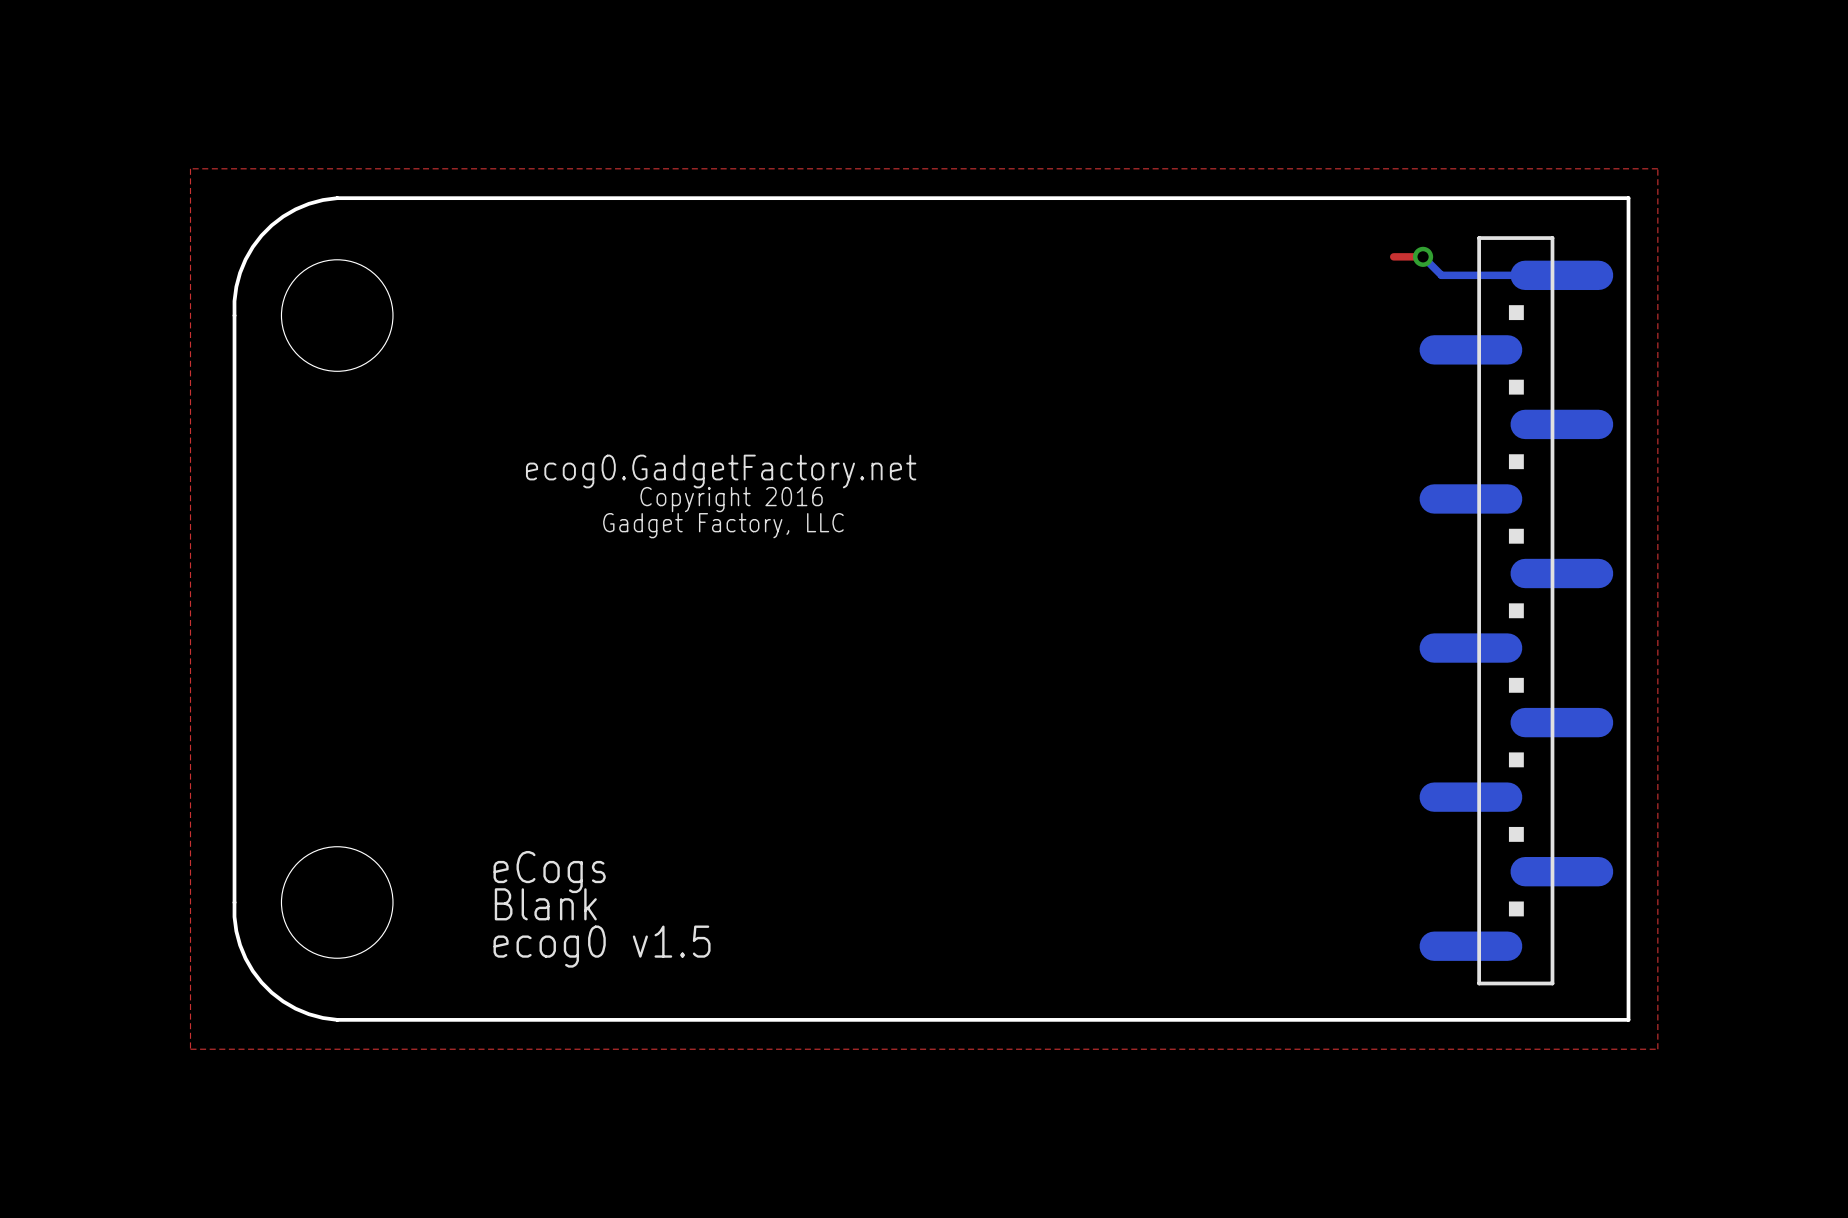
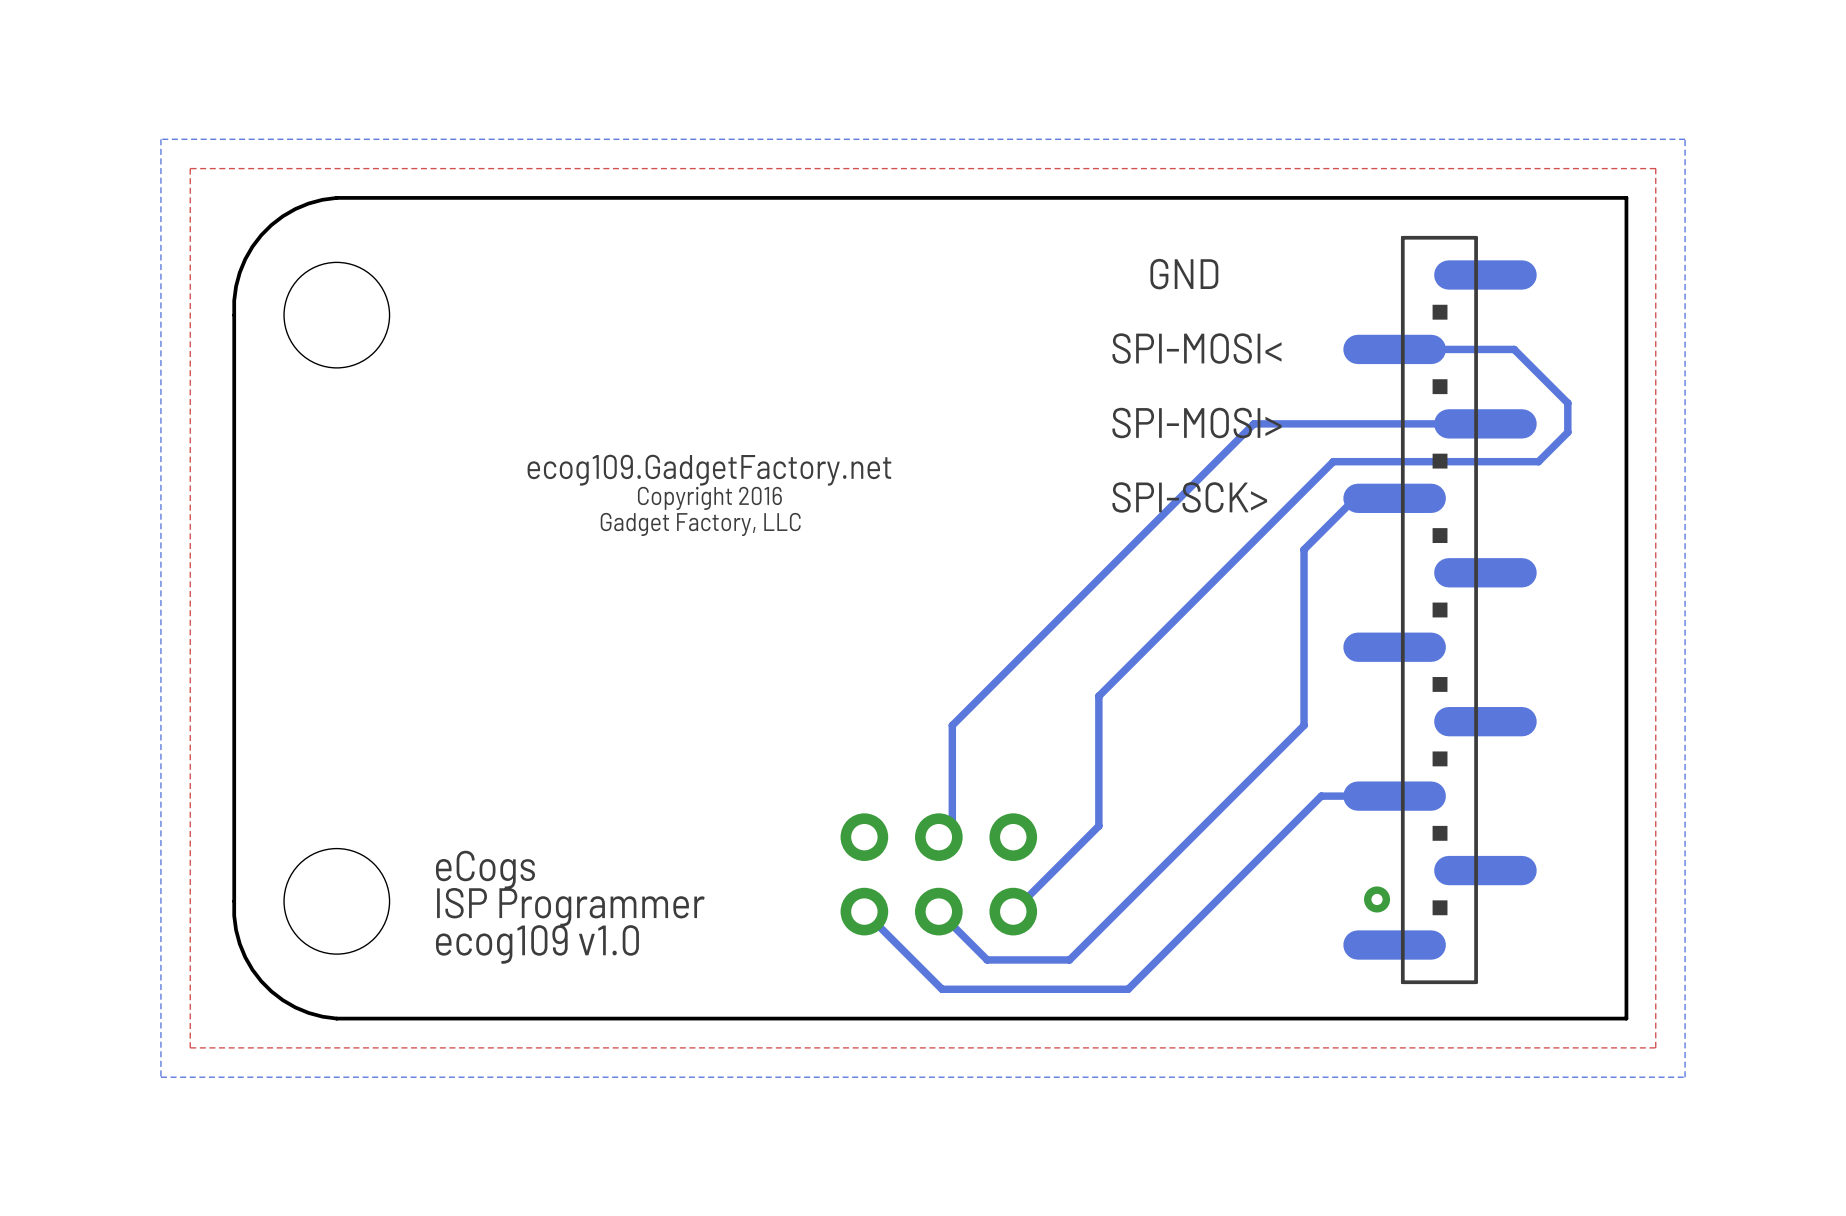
bottom zone outline: none -> (1685, 139) (160, 139) (160, 1077) (1685, 1077) (1685, 139)
part footprint: [232, 196, 1631, 1022] -> [232, 196, 1629, 1021]
bottom track: (1423, 256) (1441, 275) (1561, 275) -> none
top track: (1423, 256) (1393, 256) -> none
via: (1423, 256) -> none
text: none -> GND (1184, 274)
text: none -> SPI-MOSI< (1197, 348)
bottom track: none -> (1394, 349) (1514, 349) (1567, 403) (1567, 432) (1538, 461) (1333, 461) (1098, 696) (1098, 826) (1013, 911)
text: none -> SPI-MOSI> (1197, 423)
bottom track: none -> (1485, 423) (1253, 423) (952, 725) (952, 823) (938, 837)
text: ecog0.GadgetFactory.net (721, 471) -> ecog109.GadgetFactory.net (709, 470)
text: none -> SPI-SCK> (1189, 497)
bottom track: none -> (1394, 498) (1355, 498) (1304, 549) (1304, 725) (1069, 959) (987, 959) (938, 911)
bottom track: none -> (1394, 796) (1321, 796) (1128, 989) (942, 989) (864, 911)
text position: eCogs (549, 872) -> eCogs (485, 870)
part: none -> (938, 874)
via: none -> (1377, 899)
text: Blank (545, 904) -> none
text: none -> ISP Programmer (570, 907)
text: ecog0 v1.5 (602, 946) -> ecog109 v1.0 (537, 944)

